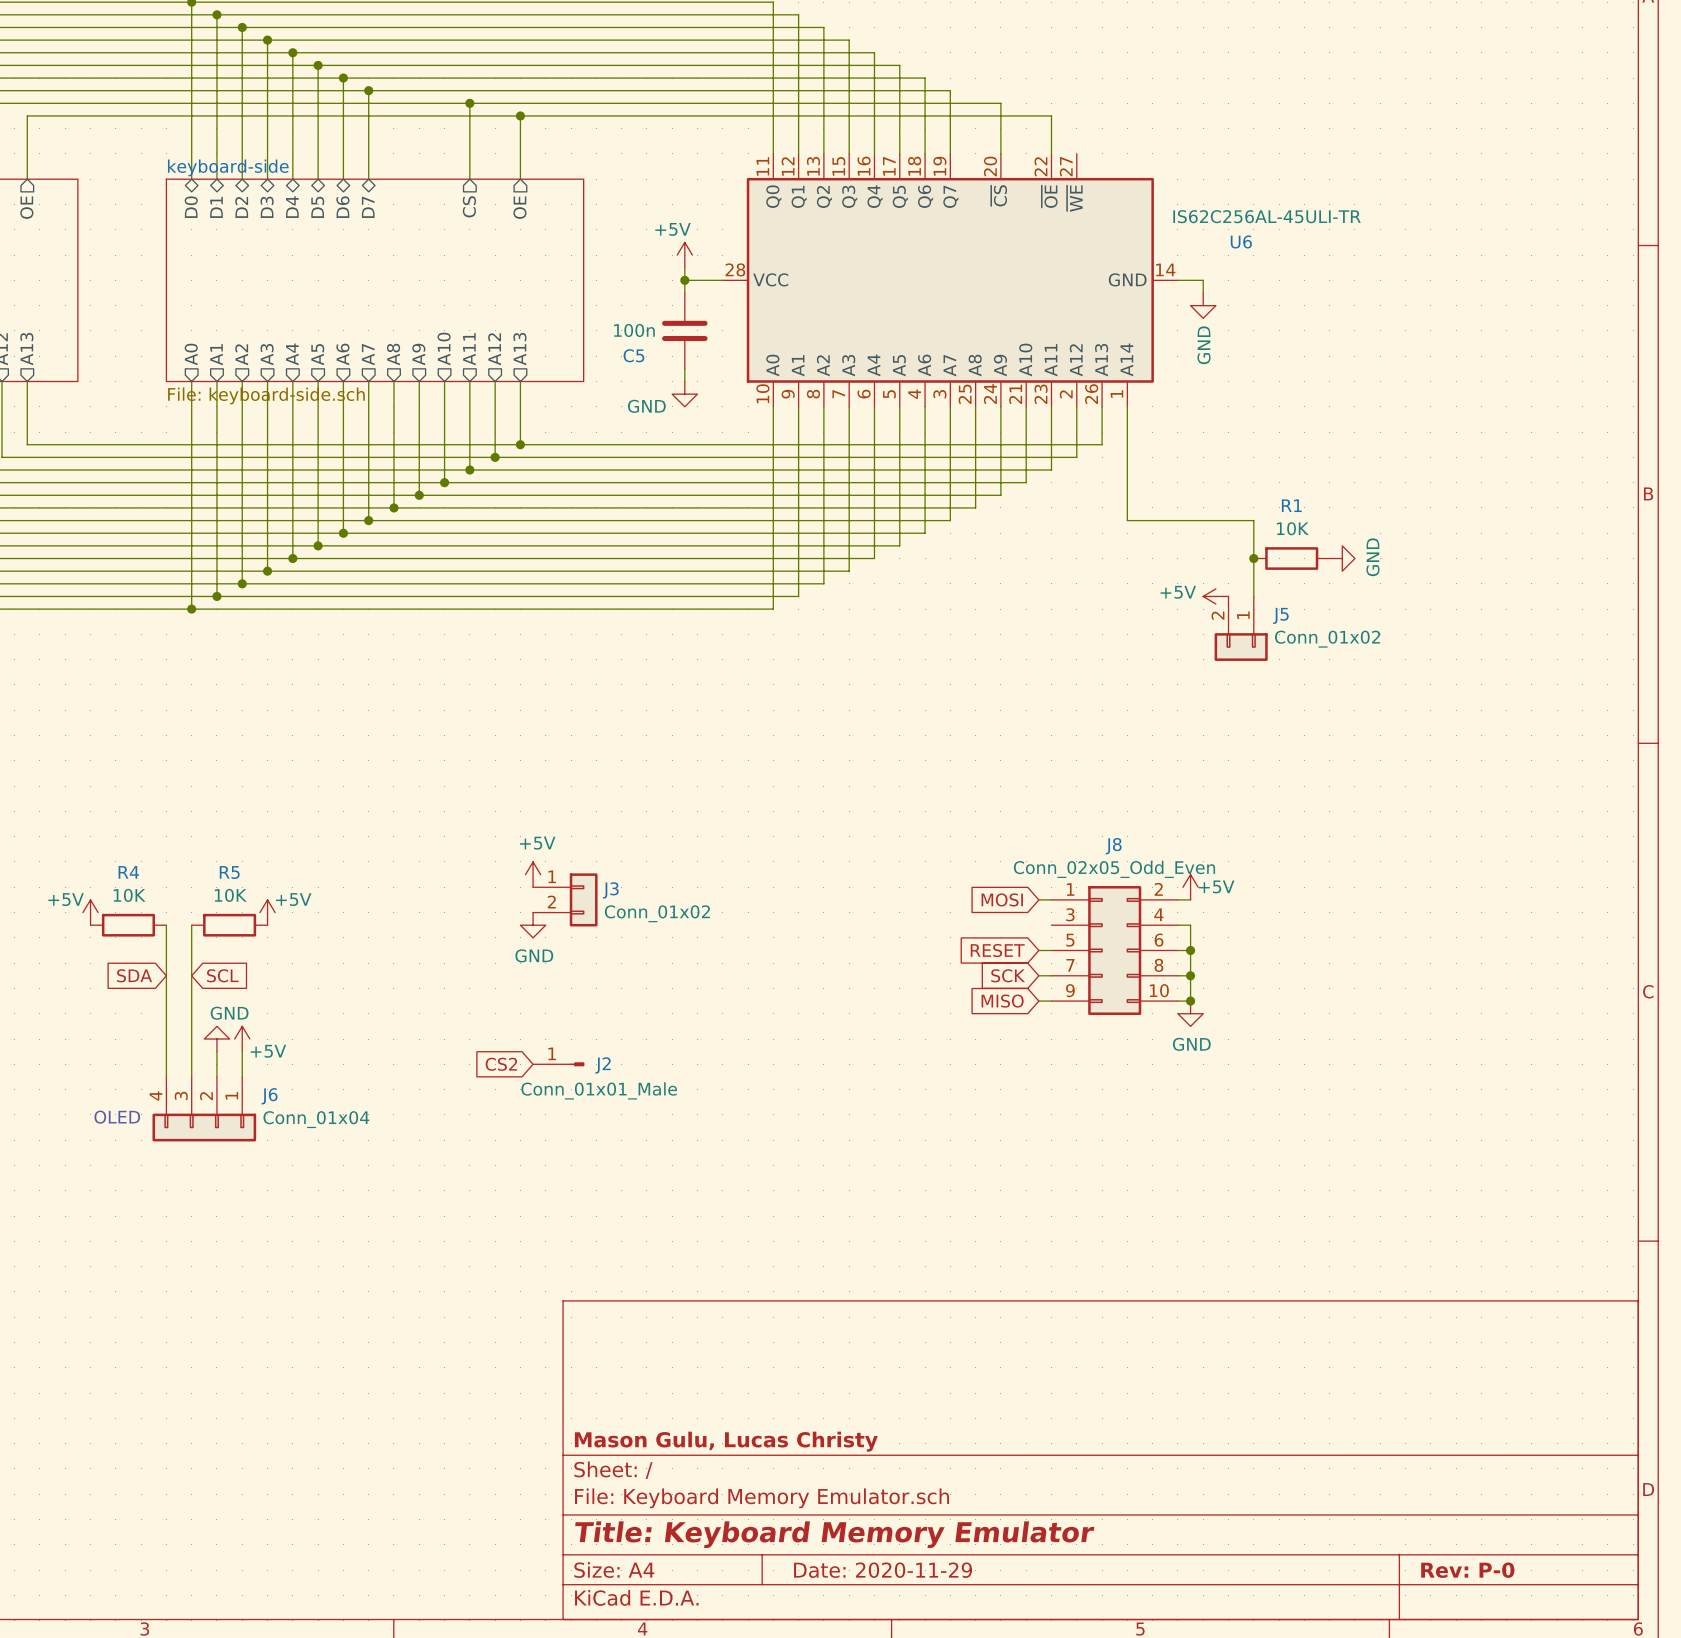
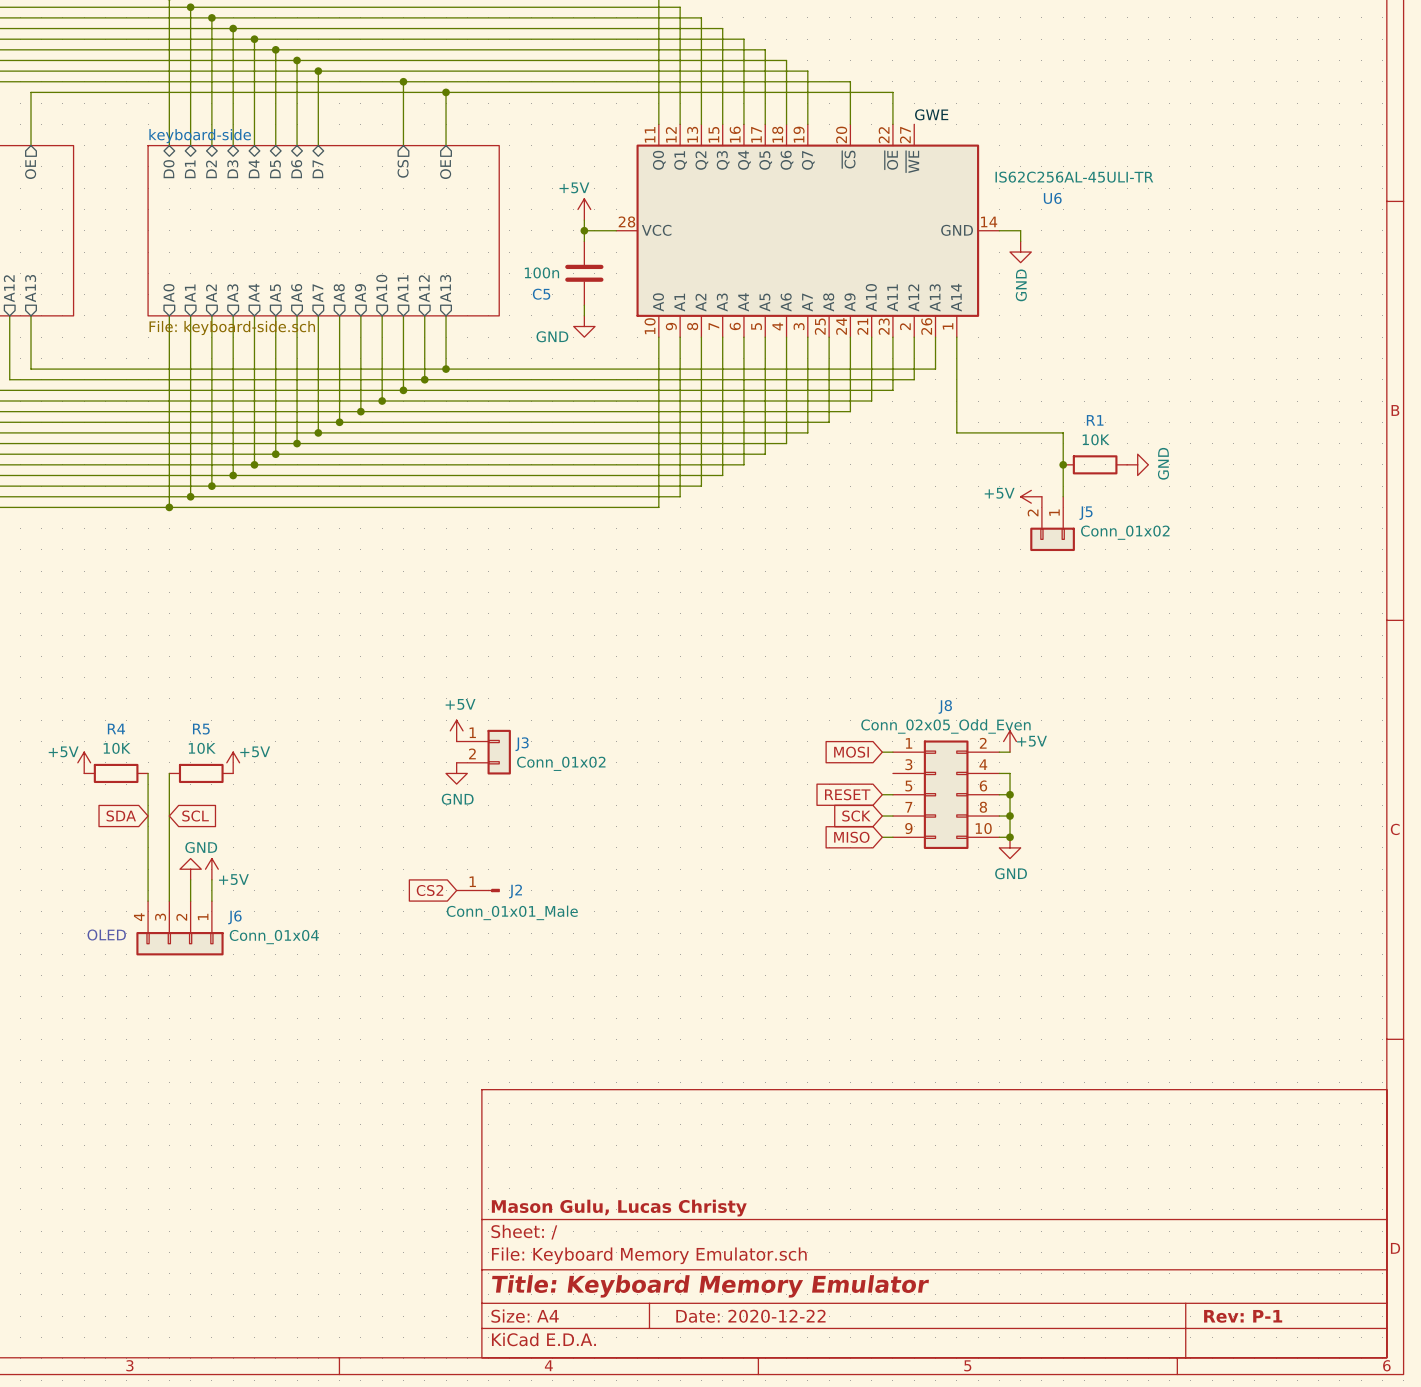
label: none -> GWE (931, 114)
title block: Date: 2020-11-29 (883, 1570) -> Date: 2020-12-22 (750, 1316)
title block: Rev: P-0 (1467, 1570) -> Rev: P-1 (1243, 1316)

